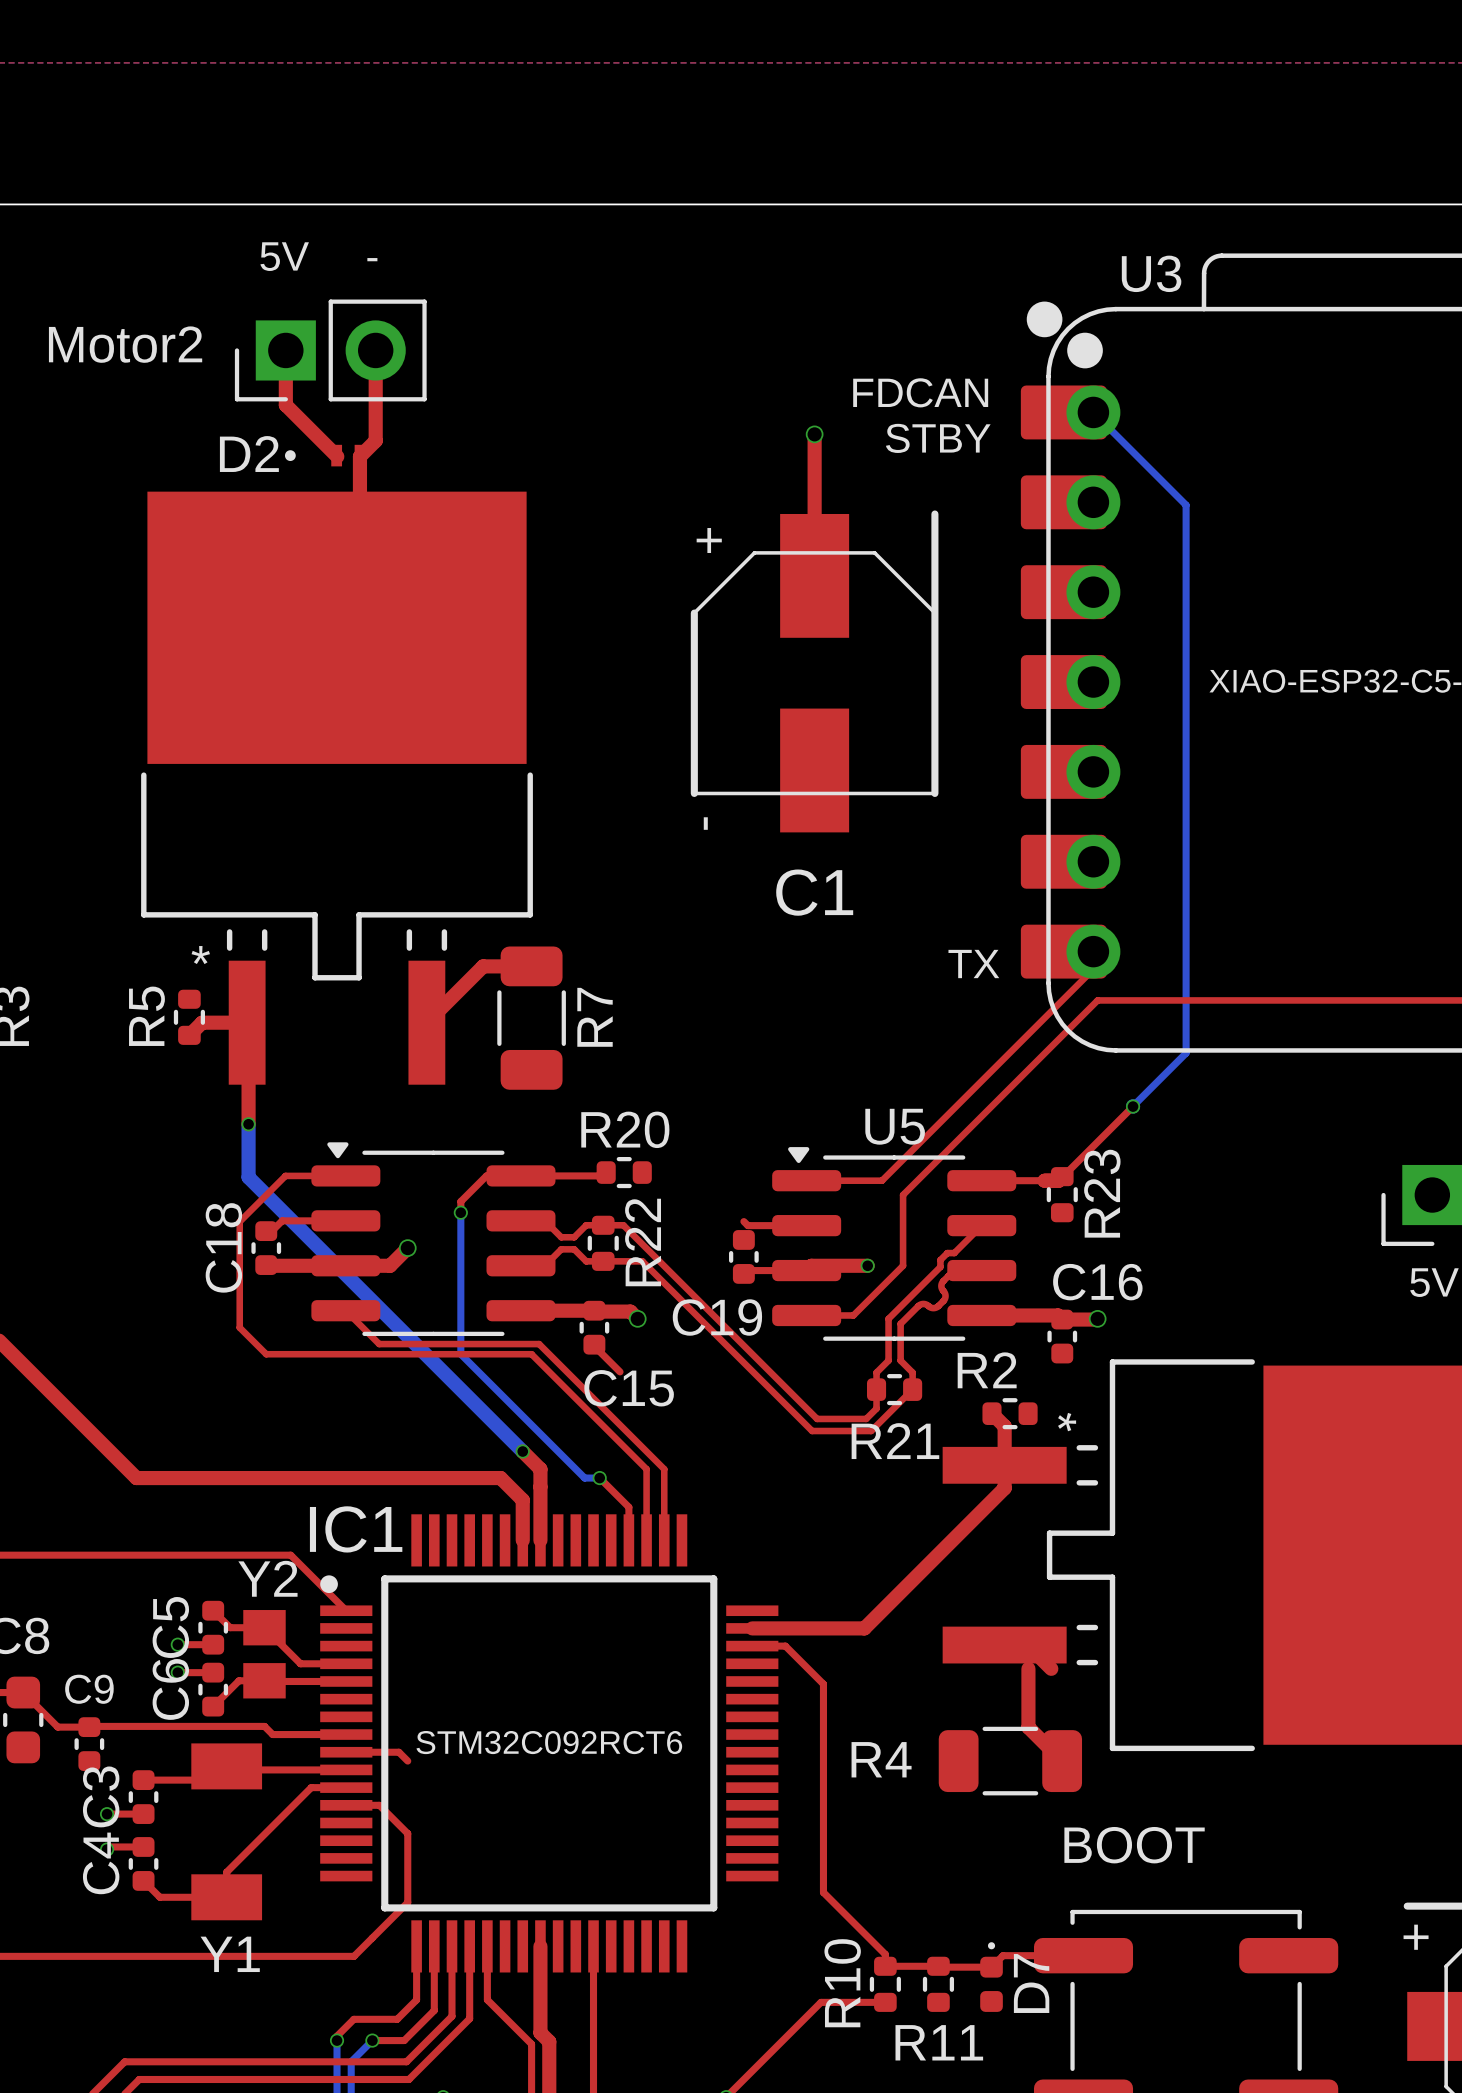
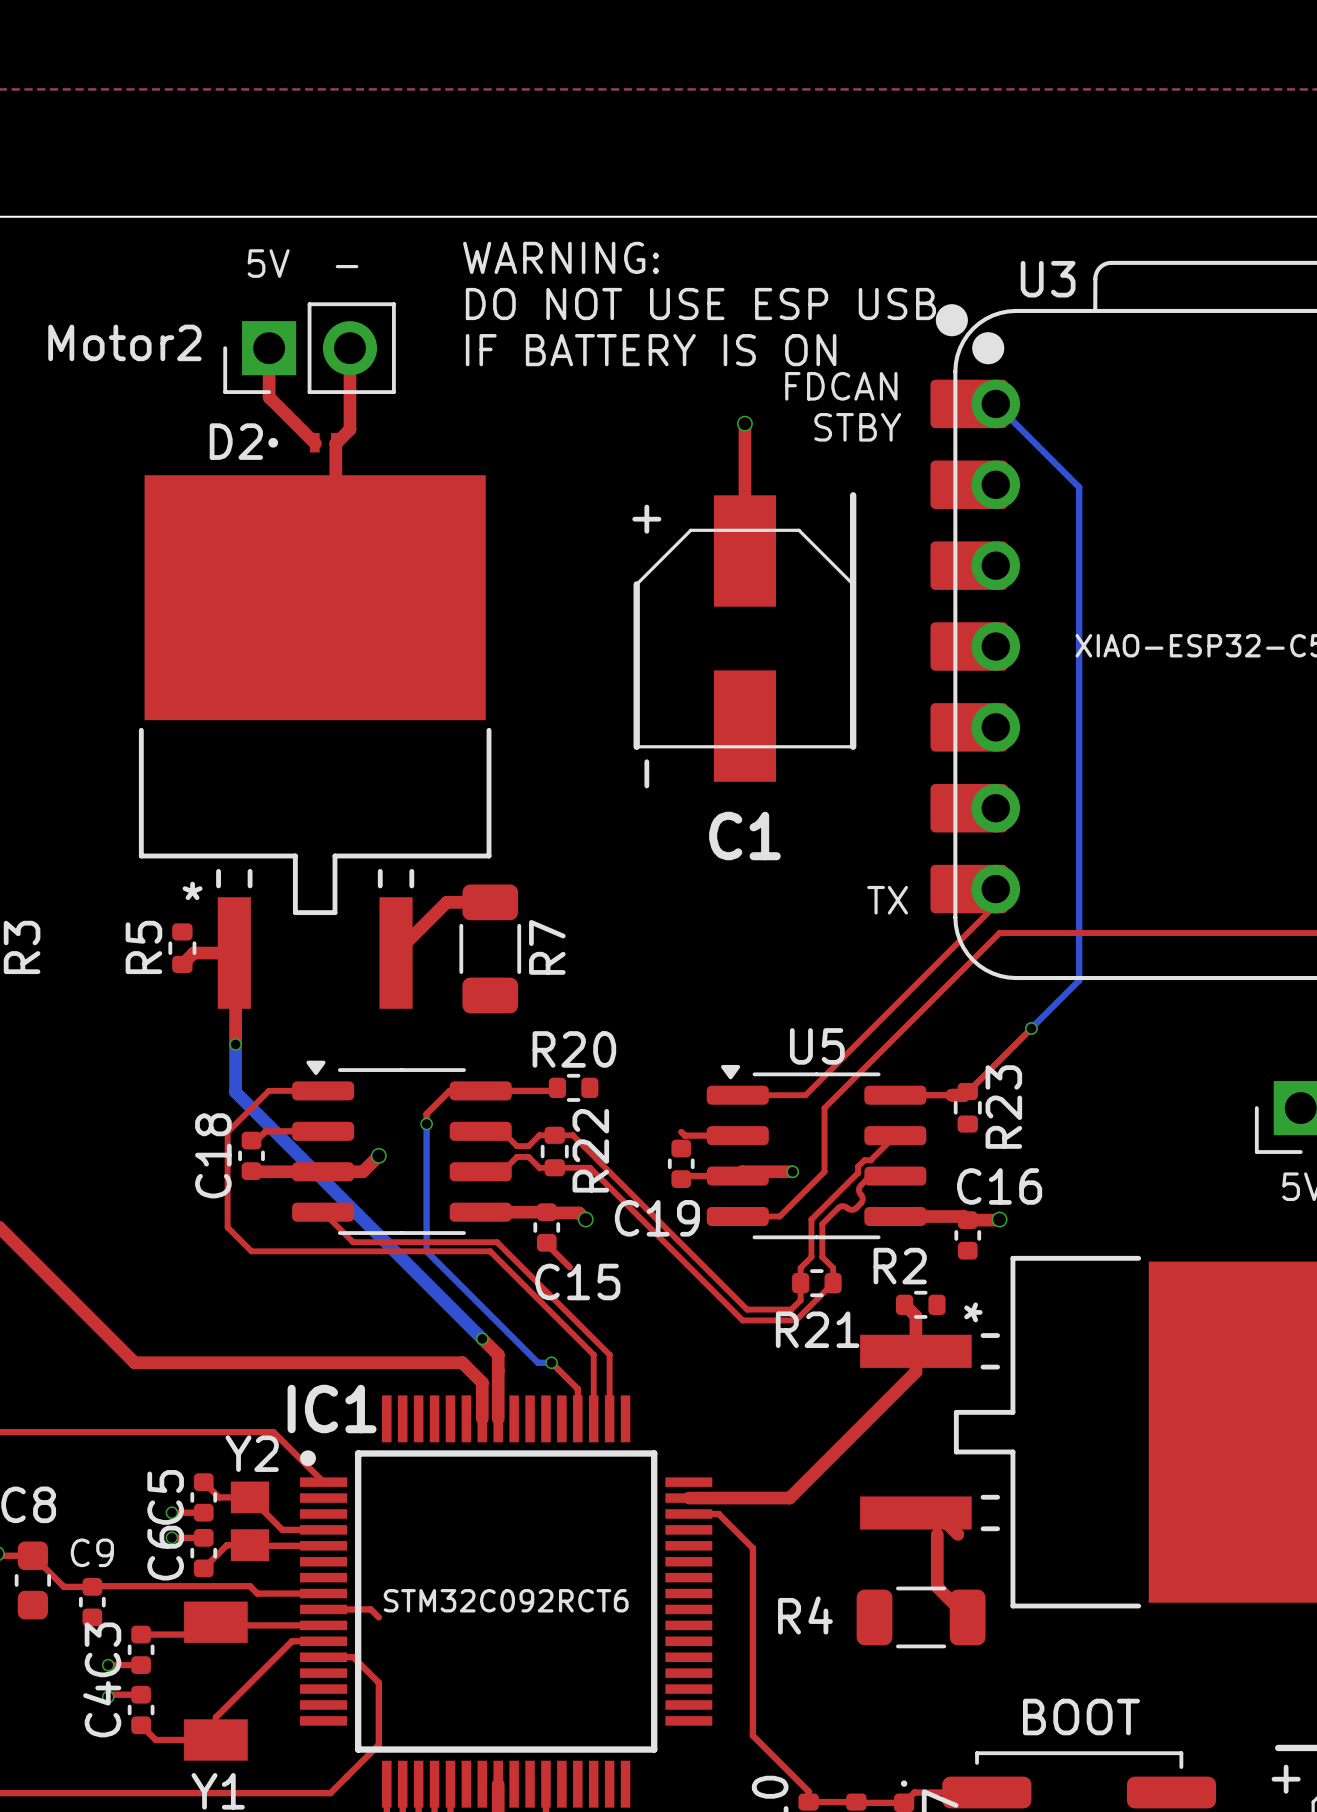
text: none -> WARNING: (561, 257)
text: none -> DO NOT USE ESP USB (700, 304)
text: none -> IF BATTERY IS ON (651, 350)
text position: BOOT (1134, 1845) -> BOOT (1081, 1717)

